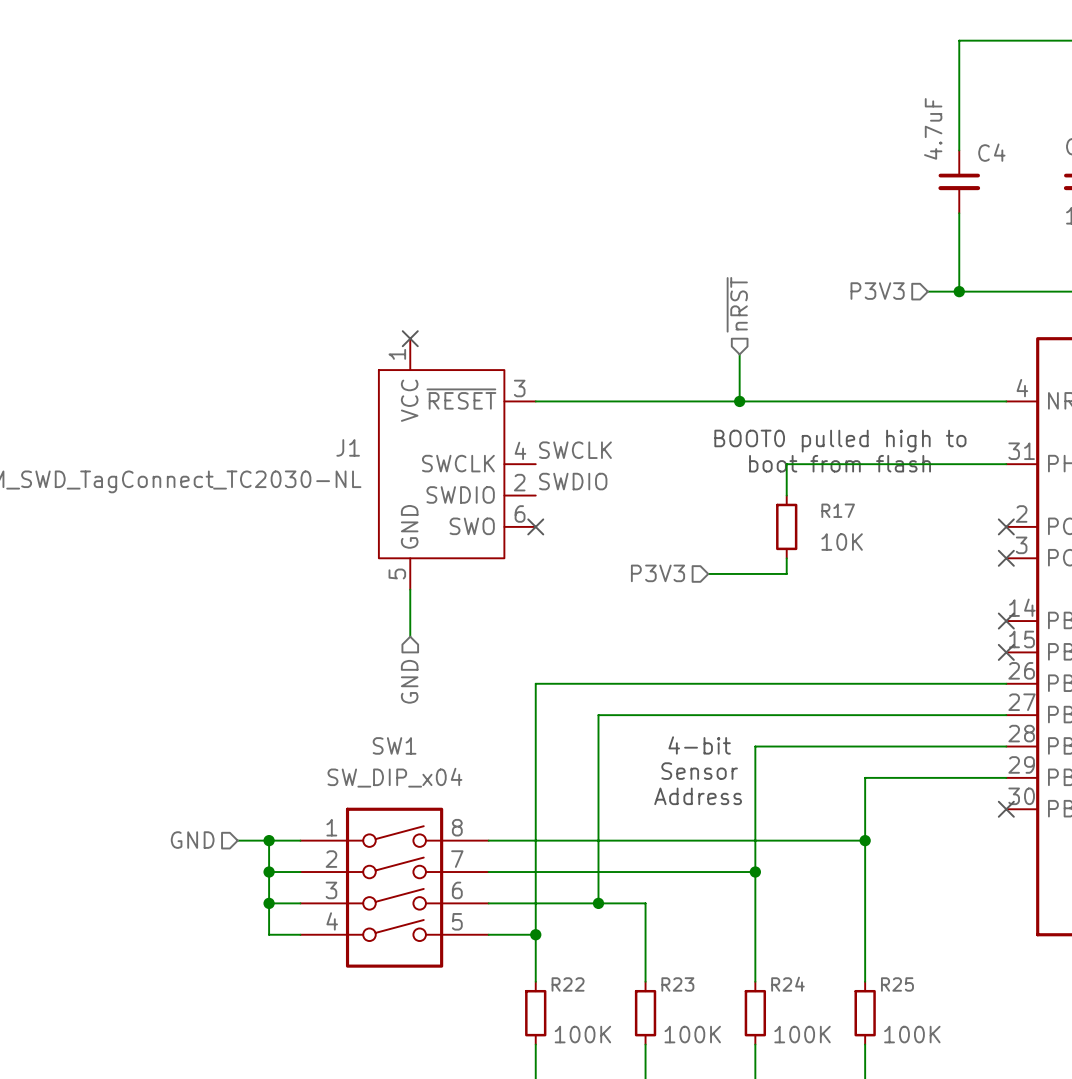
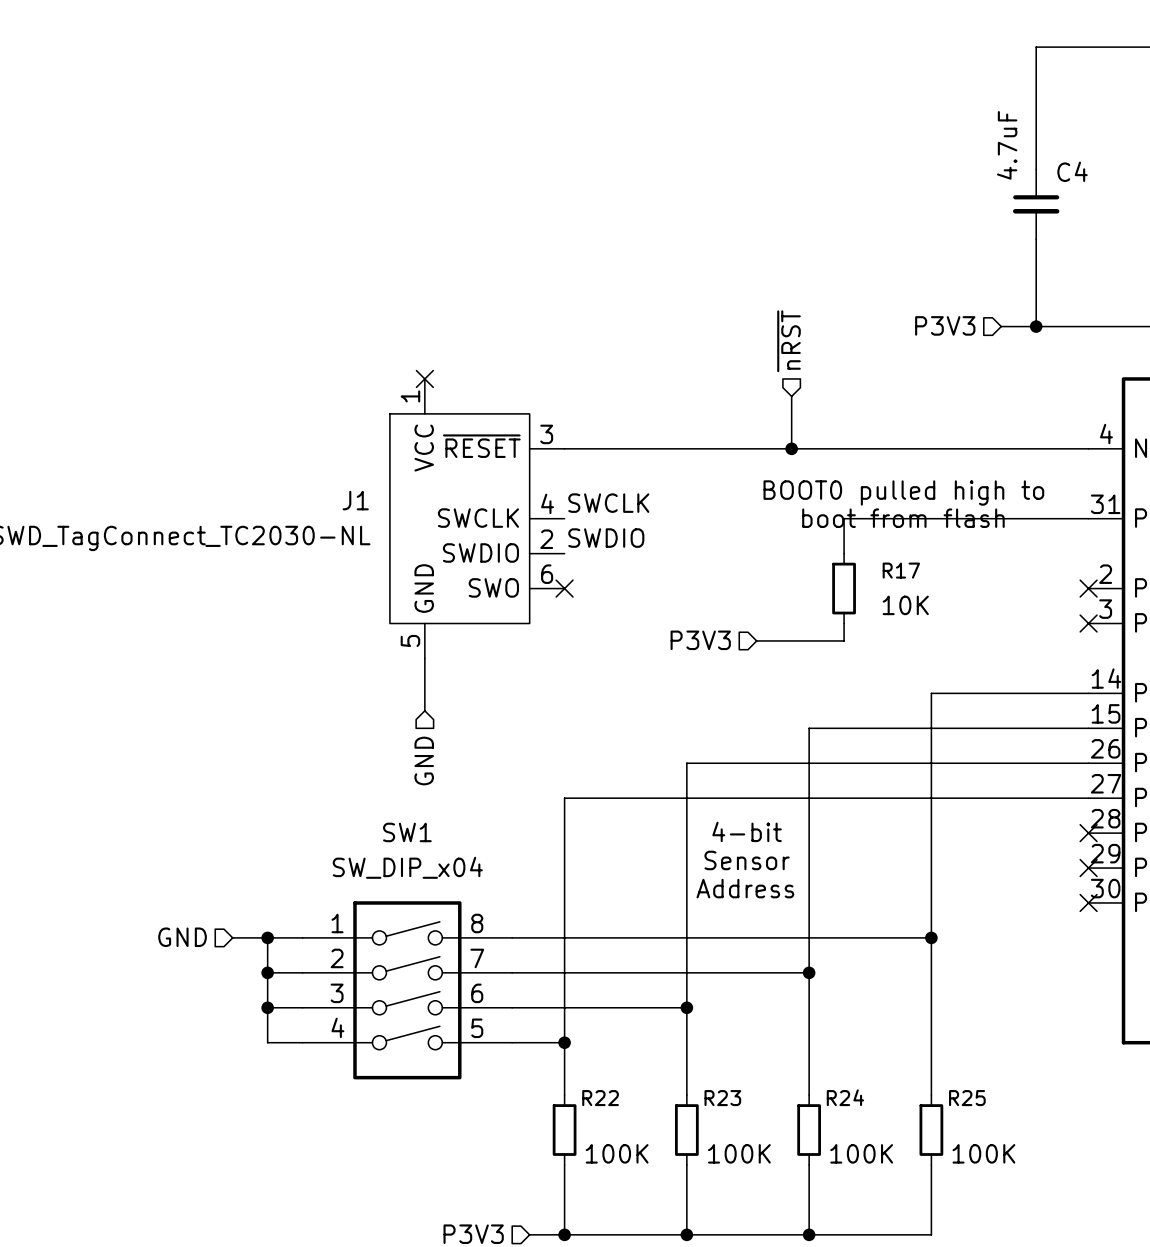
no-connect mark: (1006, 621) -> none
no-connect mark: (1006, 652) -> none
wire: (645, 683) (535, 683) (535, 715) -> (634, 798) (564, 798)
wire: none -> (686, 763) (686, 1007)
wire: (598, 715) (598, 903) -> none
wire: (755, 746) (1006, 746) -> (809, 833) (809, 728) (1088, 728)
no-connect mark: none -> (1088, 833)
wire: (865, 777) (1006, 777) -> (931, 868) (931, 693) (1088, 693)
no-connect mark: none -> (1088, 868)
junction position: (598, 903) -> (686, 1007)

